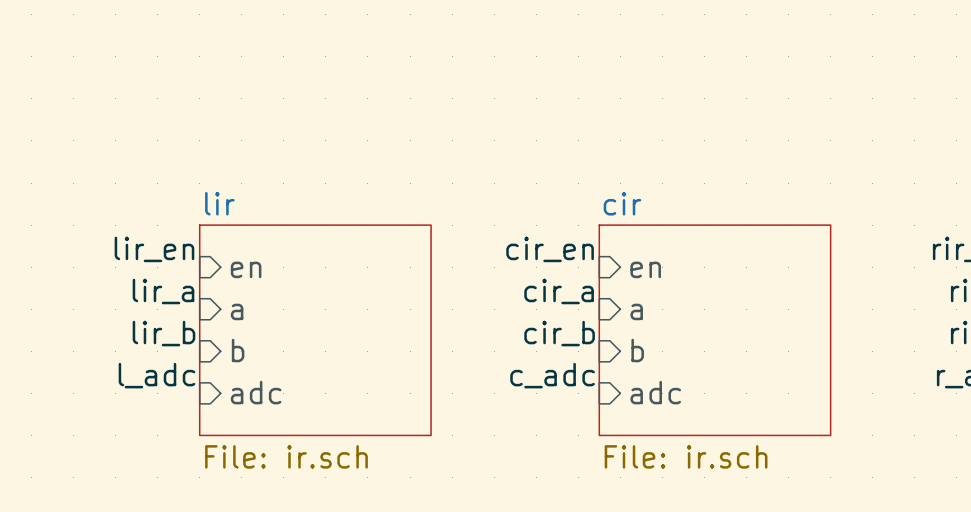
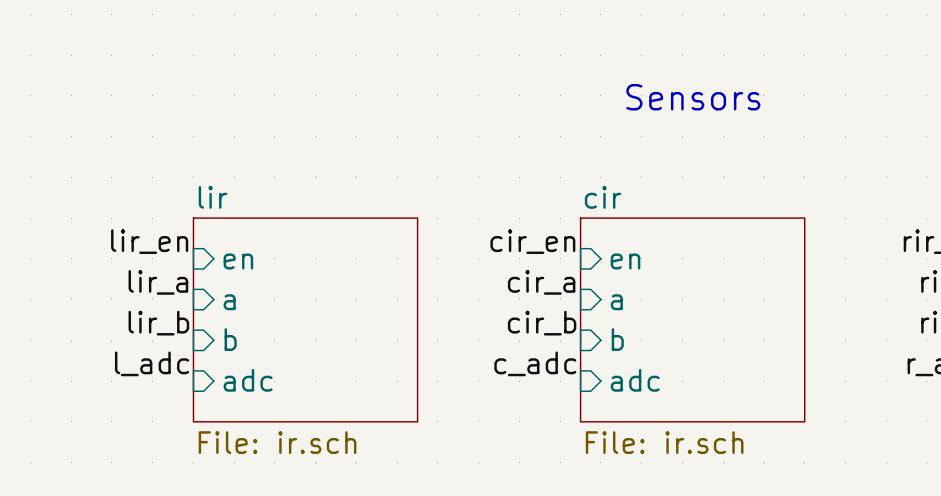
text: none -> Sensors (693, 97)

